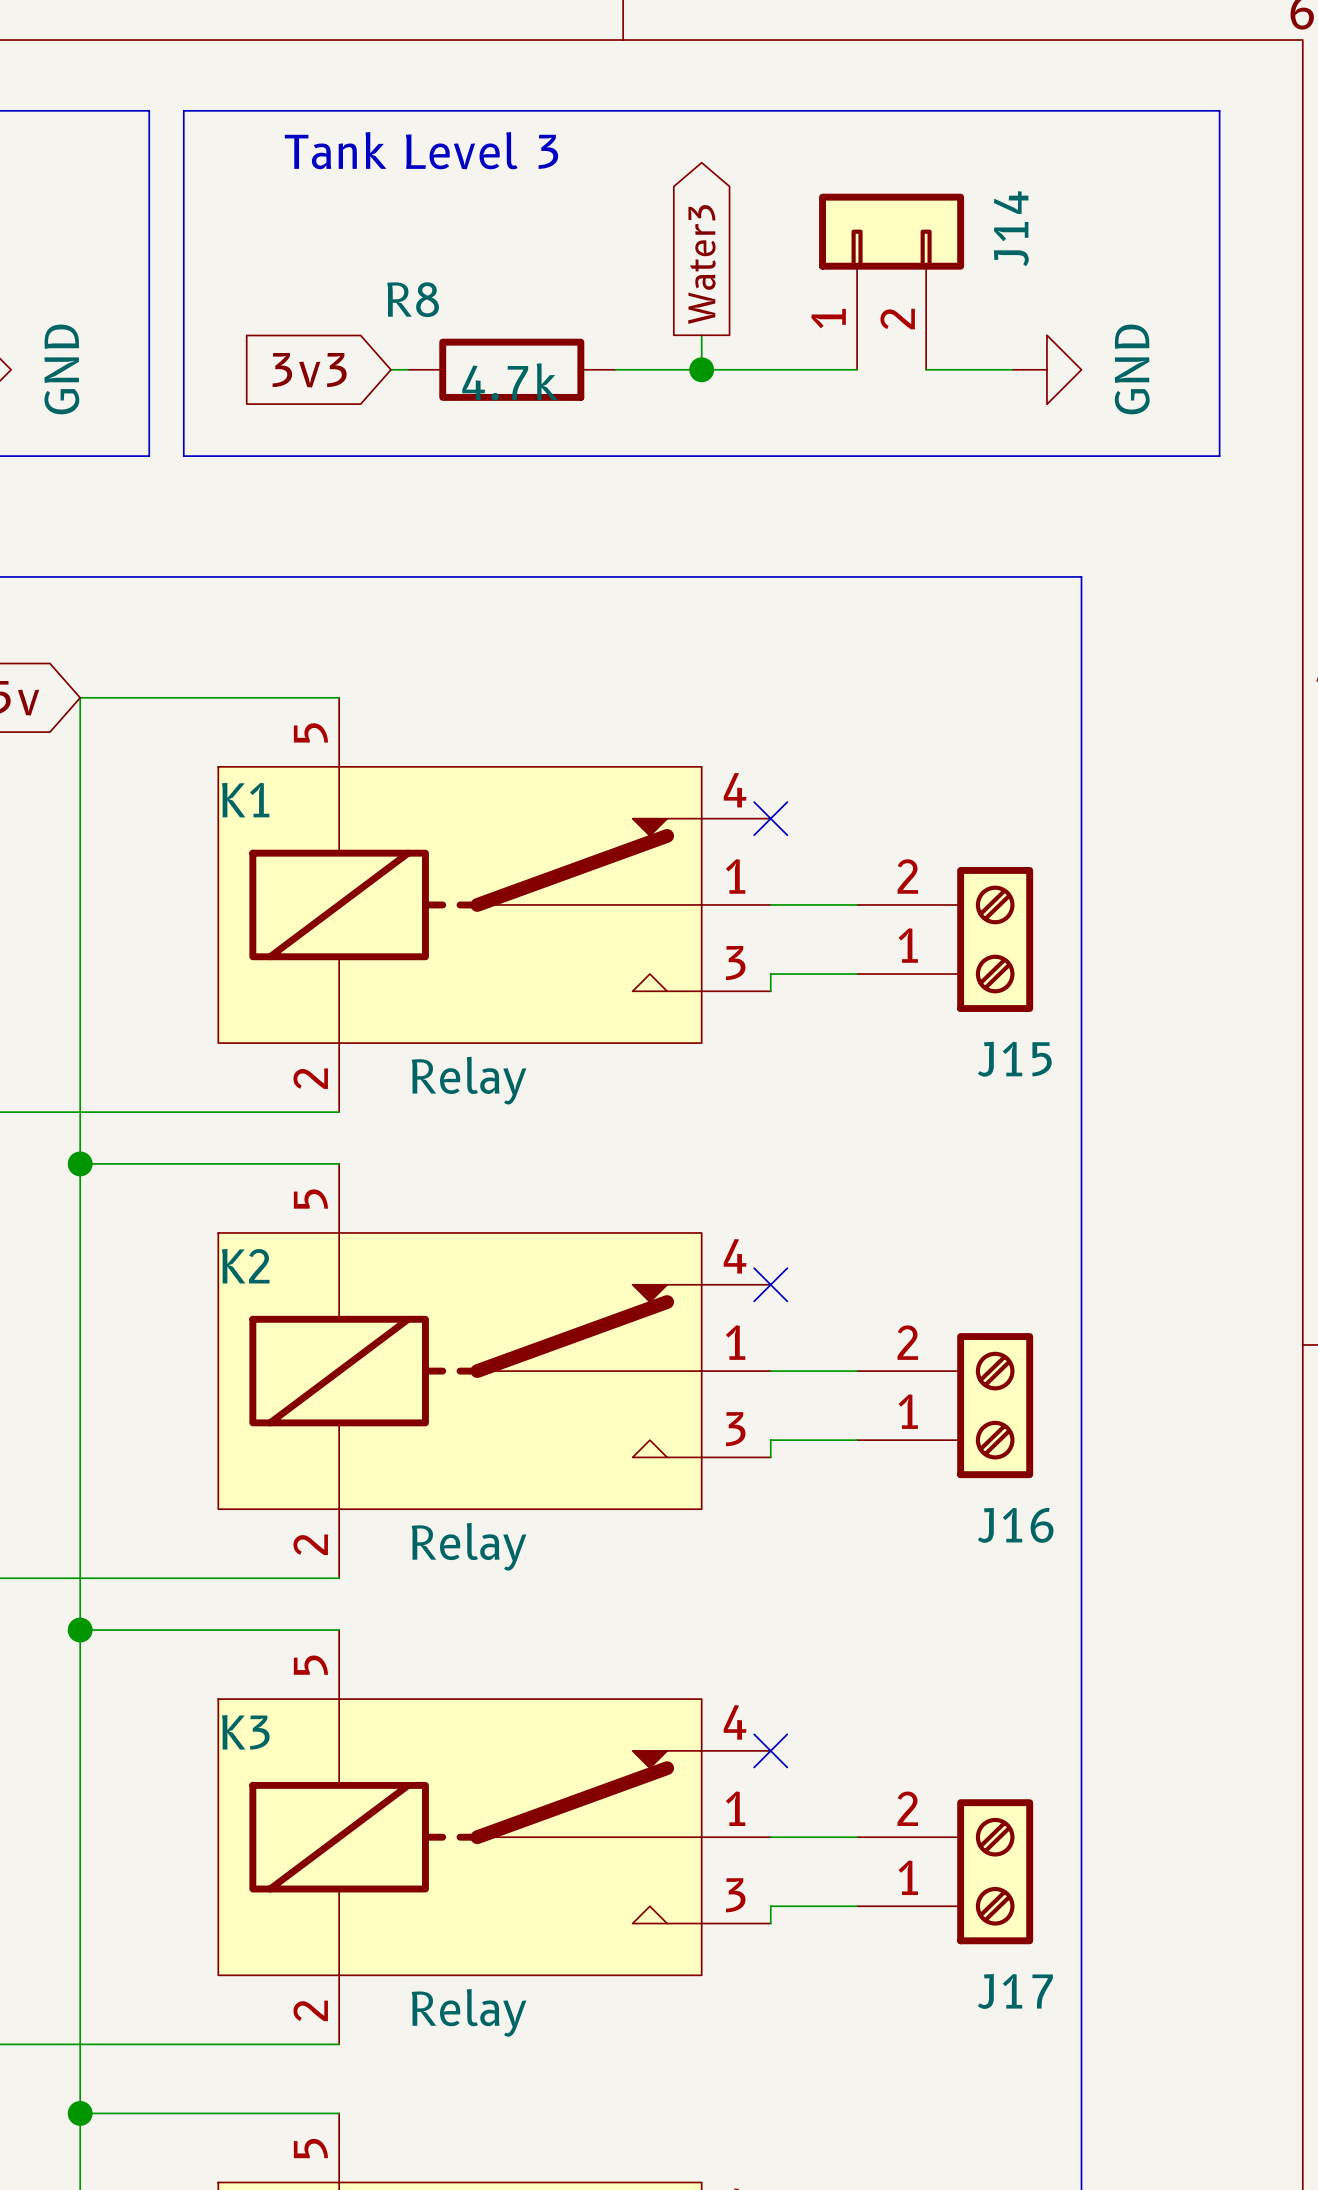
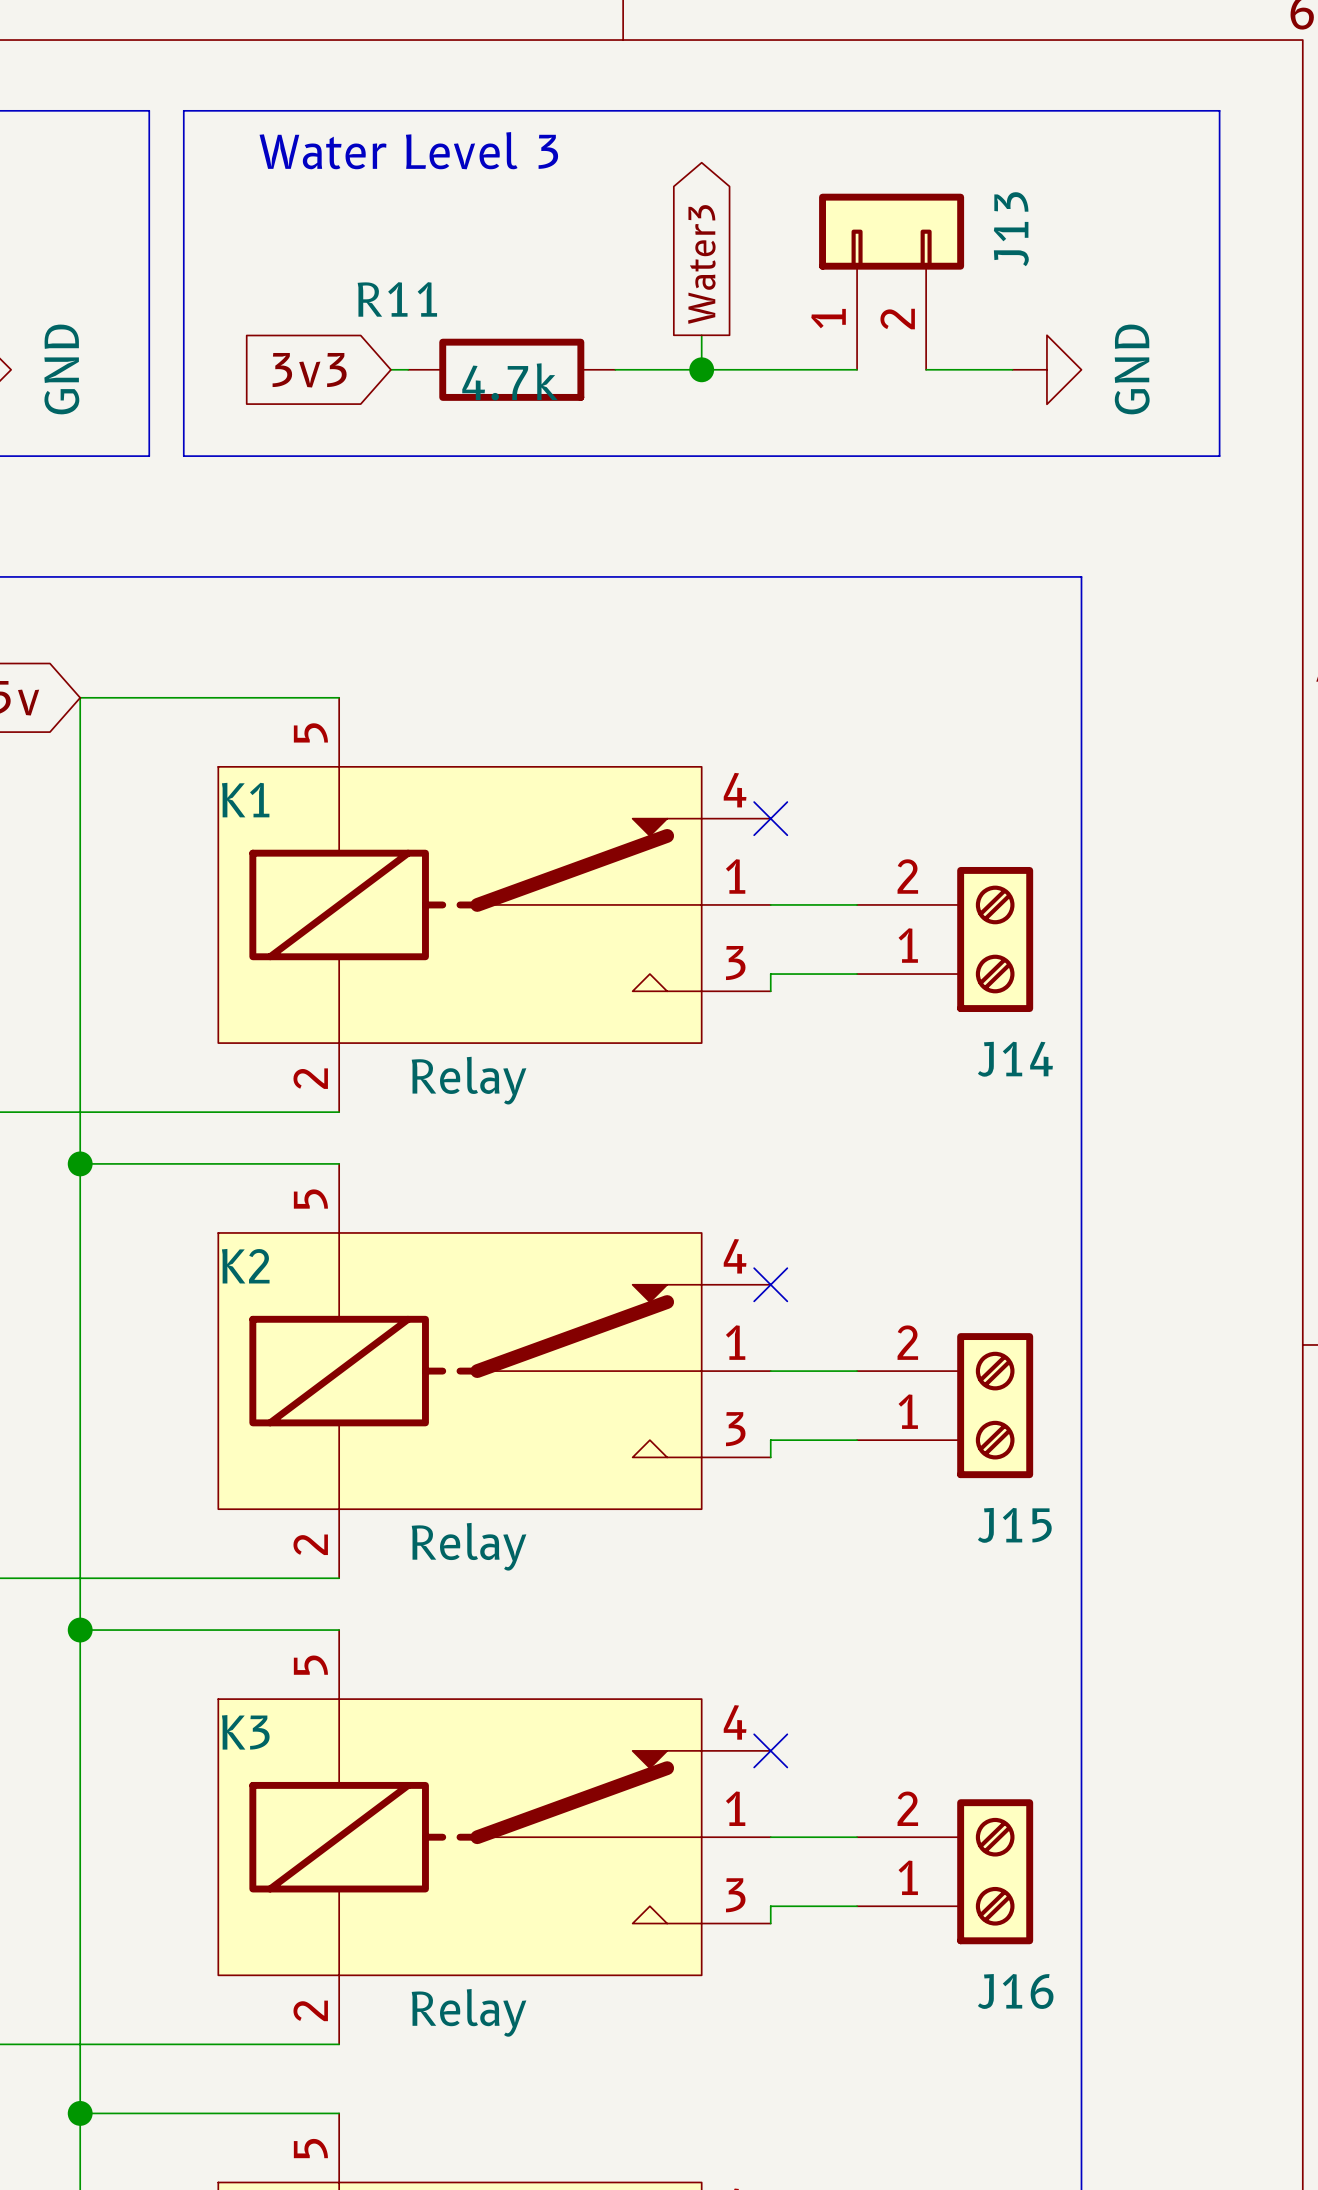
text: Tank Level 3 (421, 150) -> Water Level 3 (408, 150)
J14 name: J14 (1011, 228) -> J13 (1011, 229)
R8 name: R8 (413, 299) -> R11 (397, 299)
J15 name: J15 (1014, 1059) -> J14 (1015, 1059)
J16 name: J16 (1015, 1525) -> J15 (1014, 1525)
J17 name: J17 (1015, 1991) -> J16 (1015, 1991)

